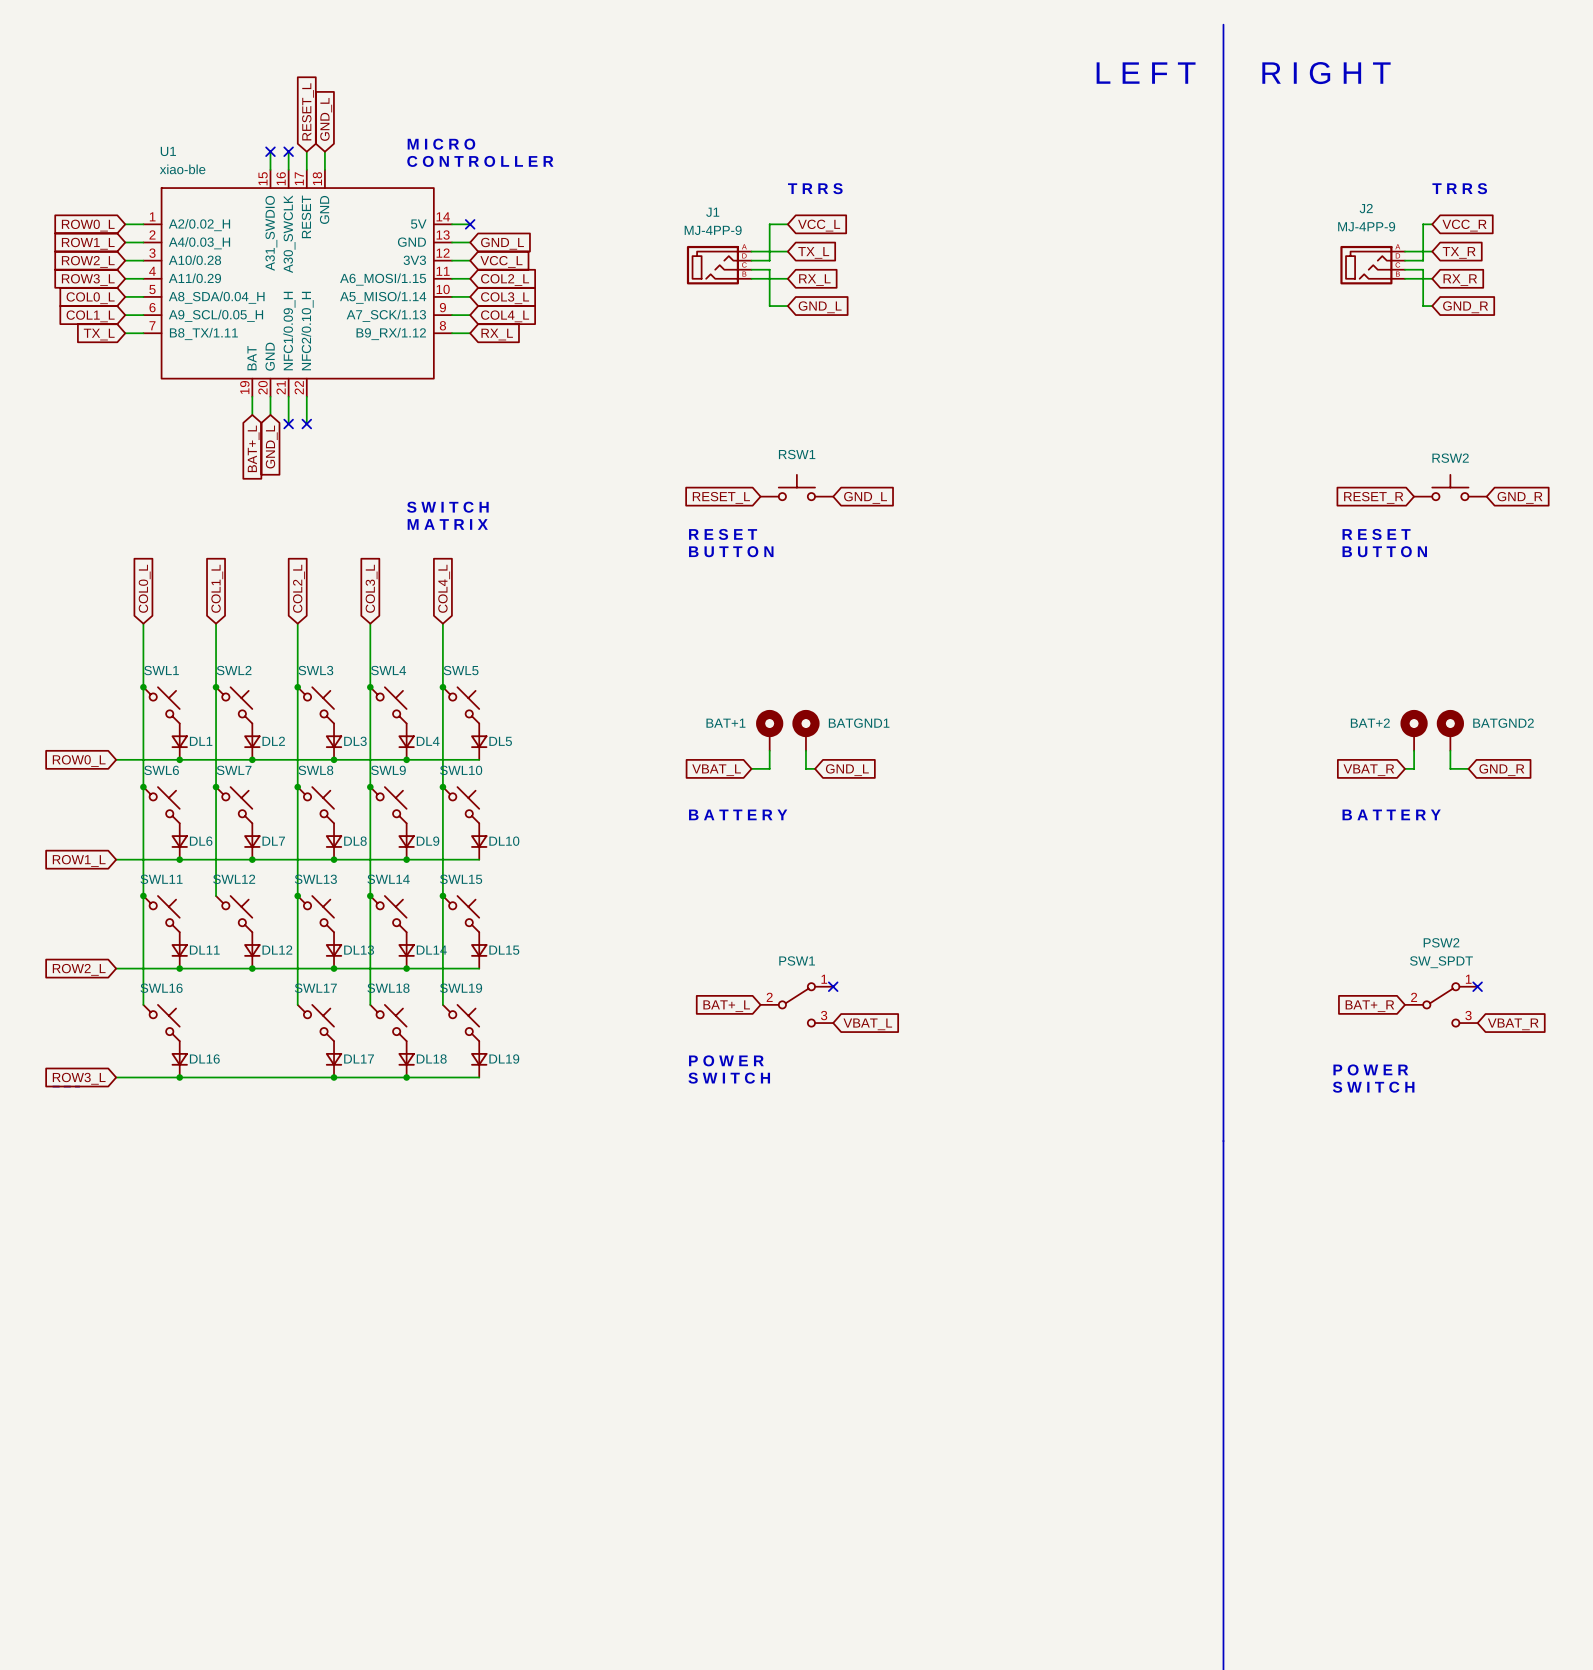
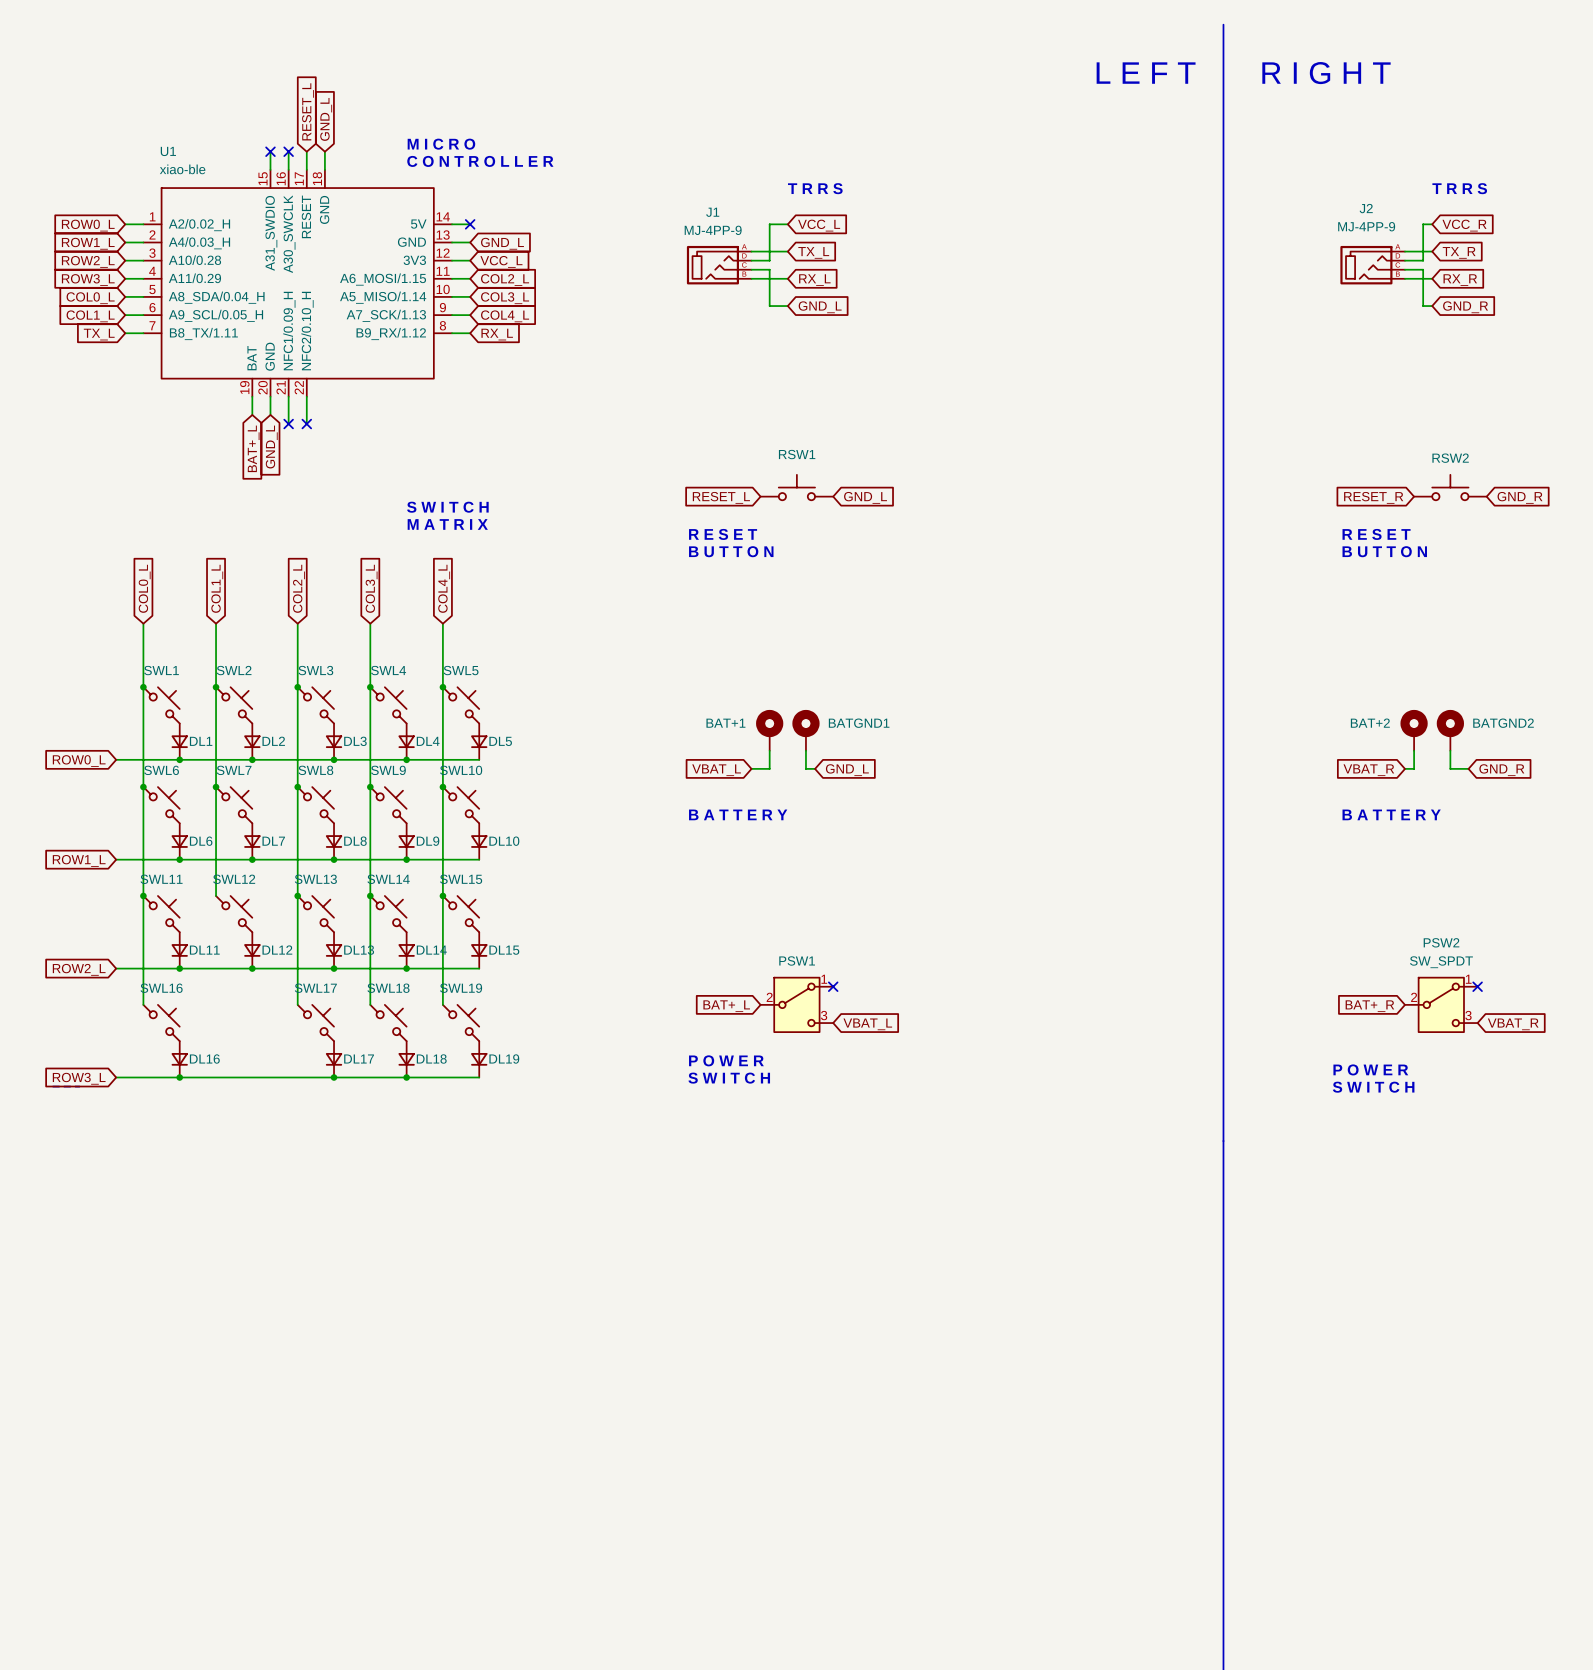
PSW1 symbol: [760, 983, 834, 1027] -> [760, 977, 834, 1033]
PSW2 symbol: [1405, 983, 1478, 1027] -> [1405, 977, 1478, 1033]

